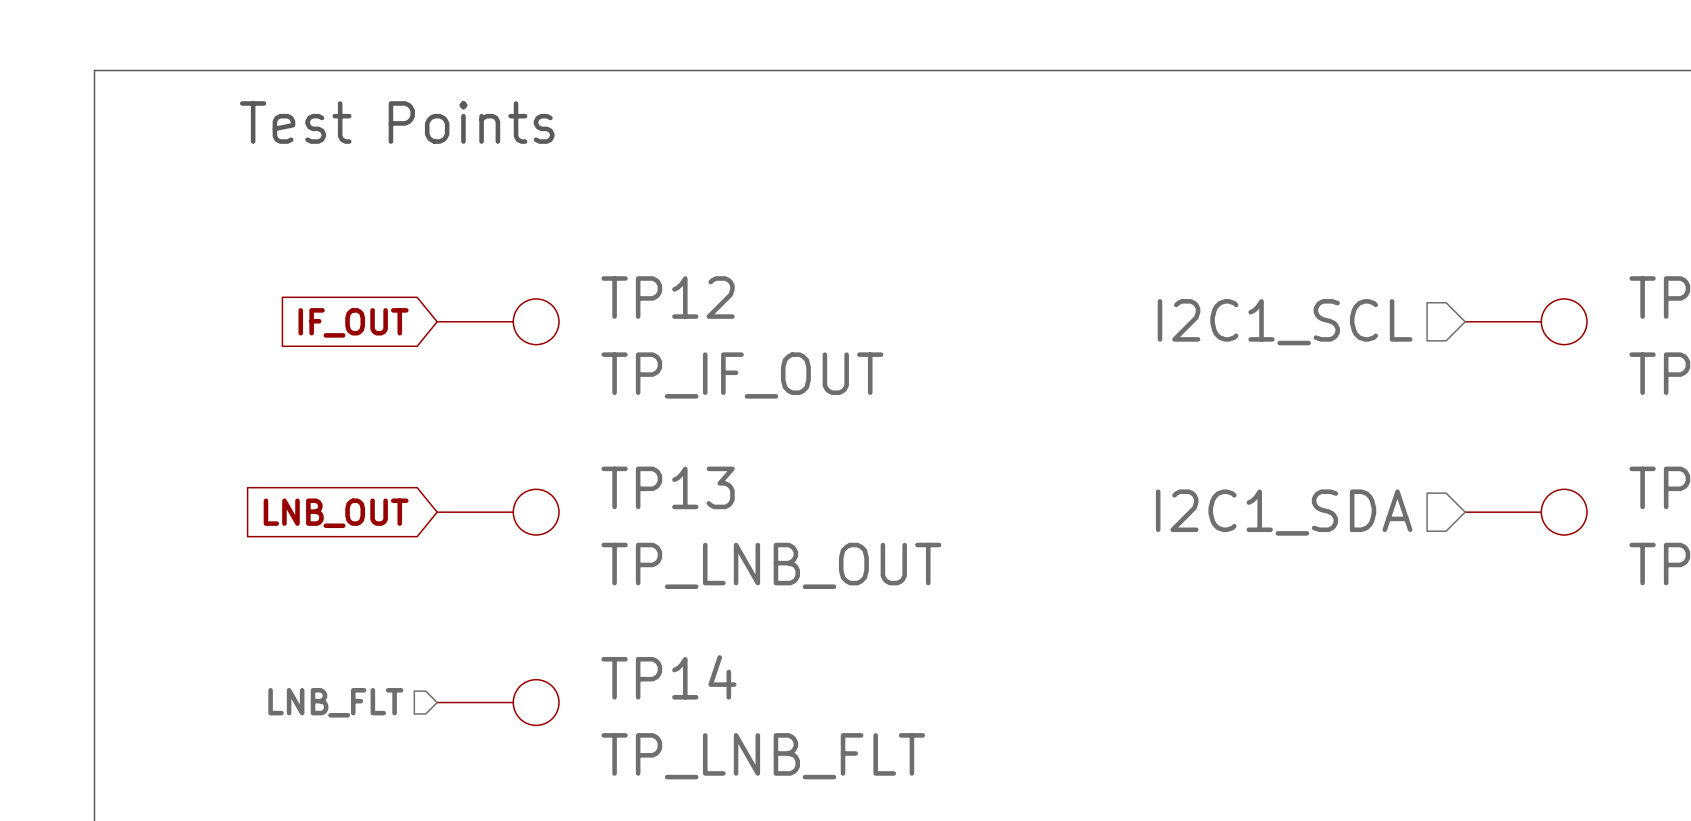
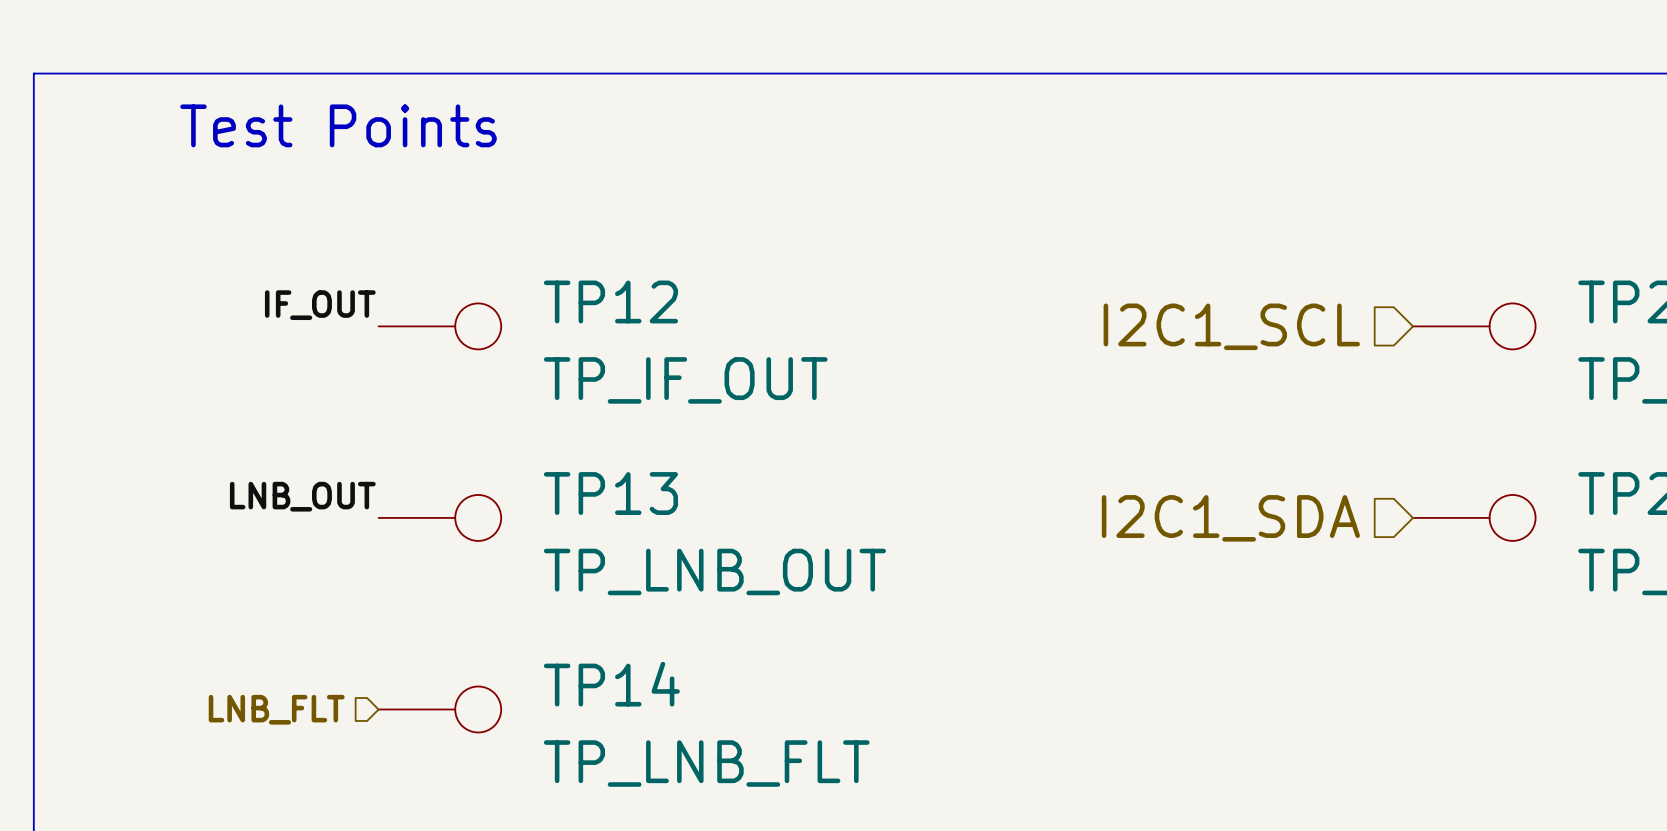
label: none -> IF_OUT (320, 305)
global label: IF_OUT (353, 322) -> none
label: none -> LNB_OUT (302, 496)
global label: LNB_OUT (336, 513) -> none

